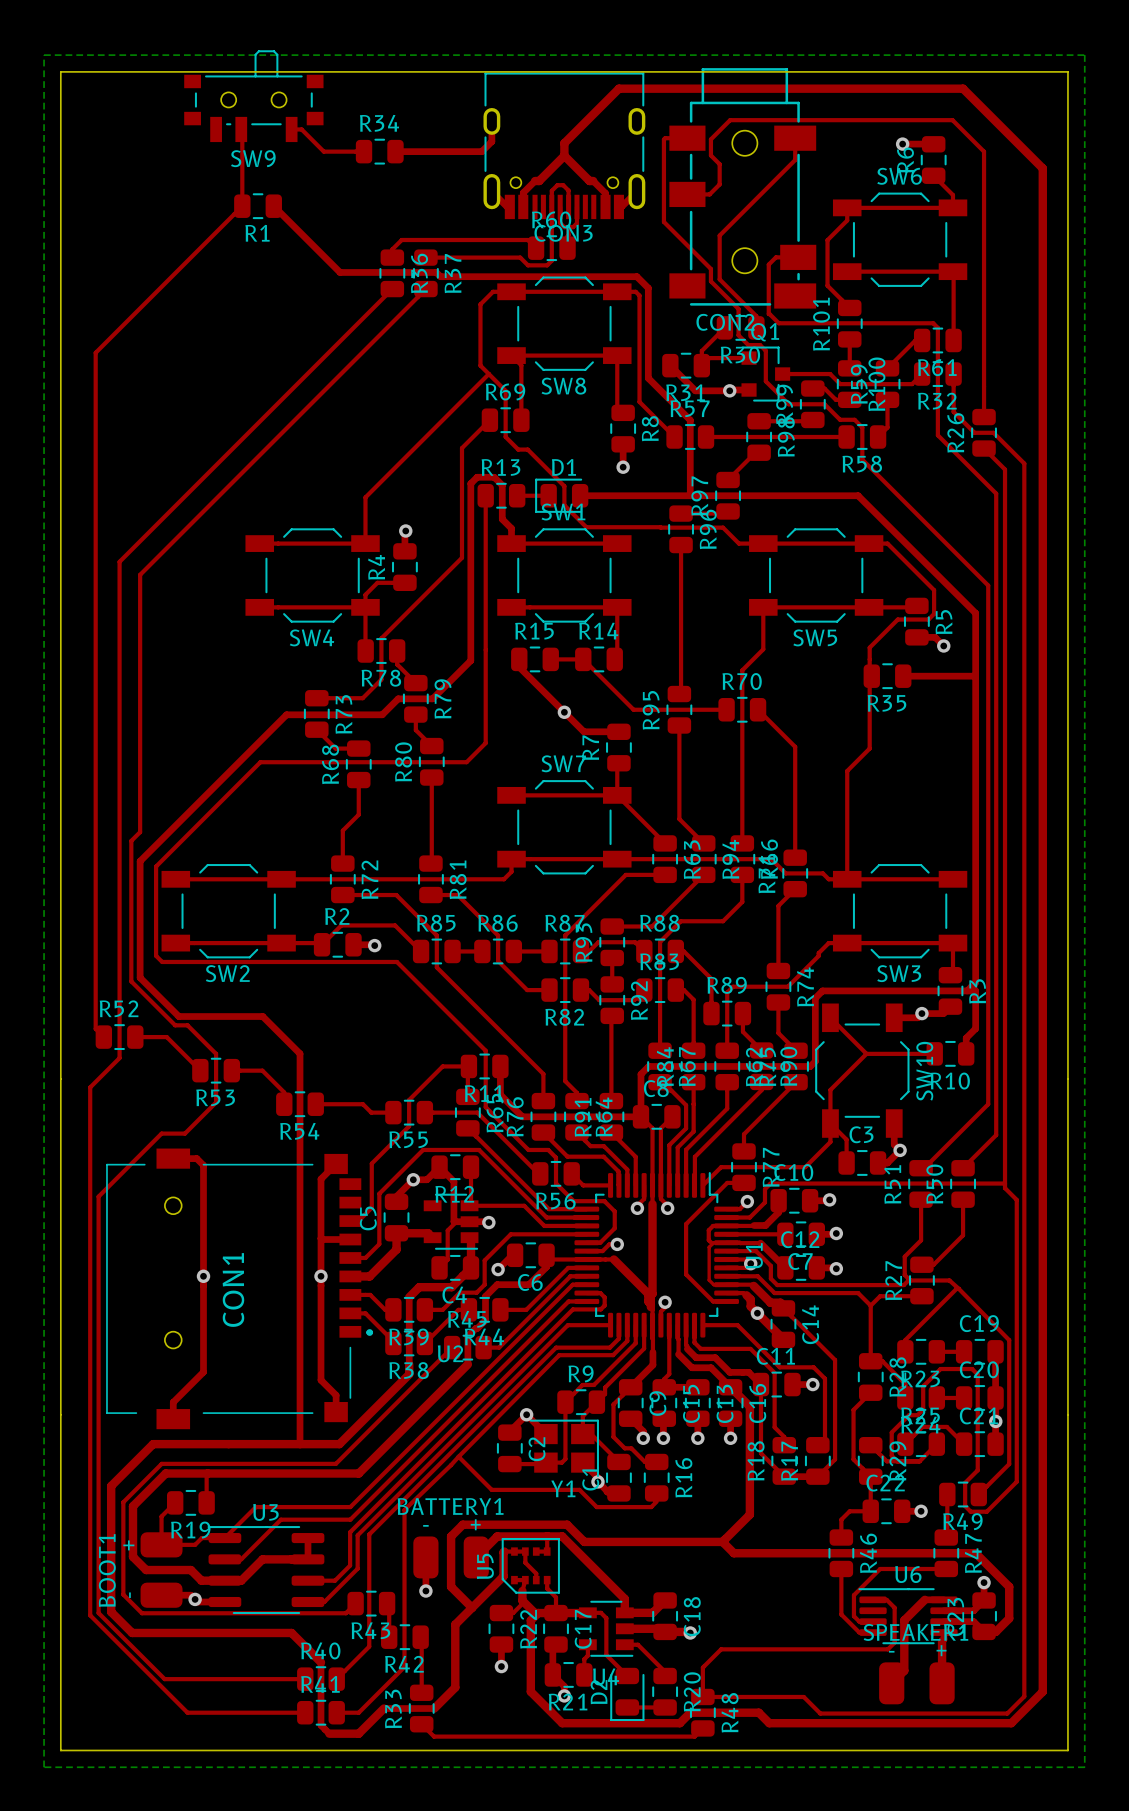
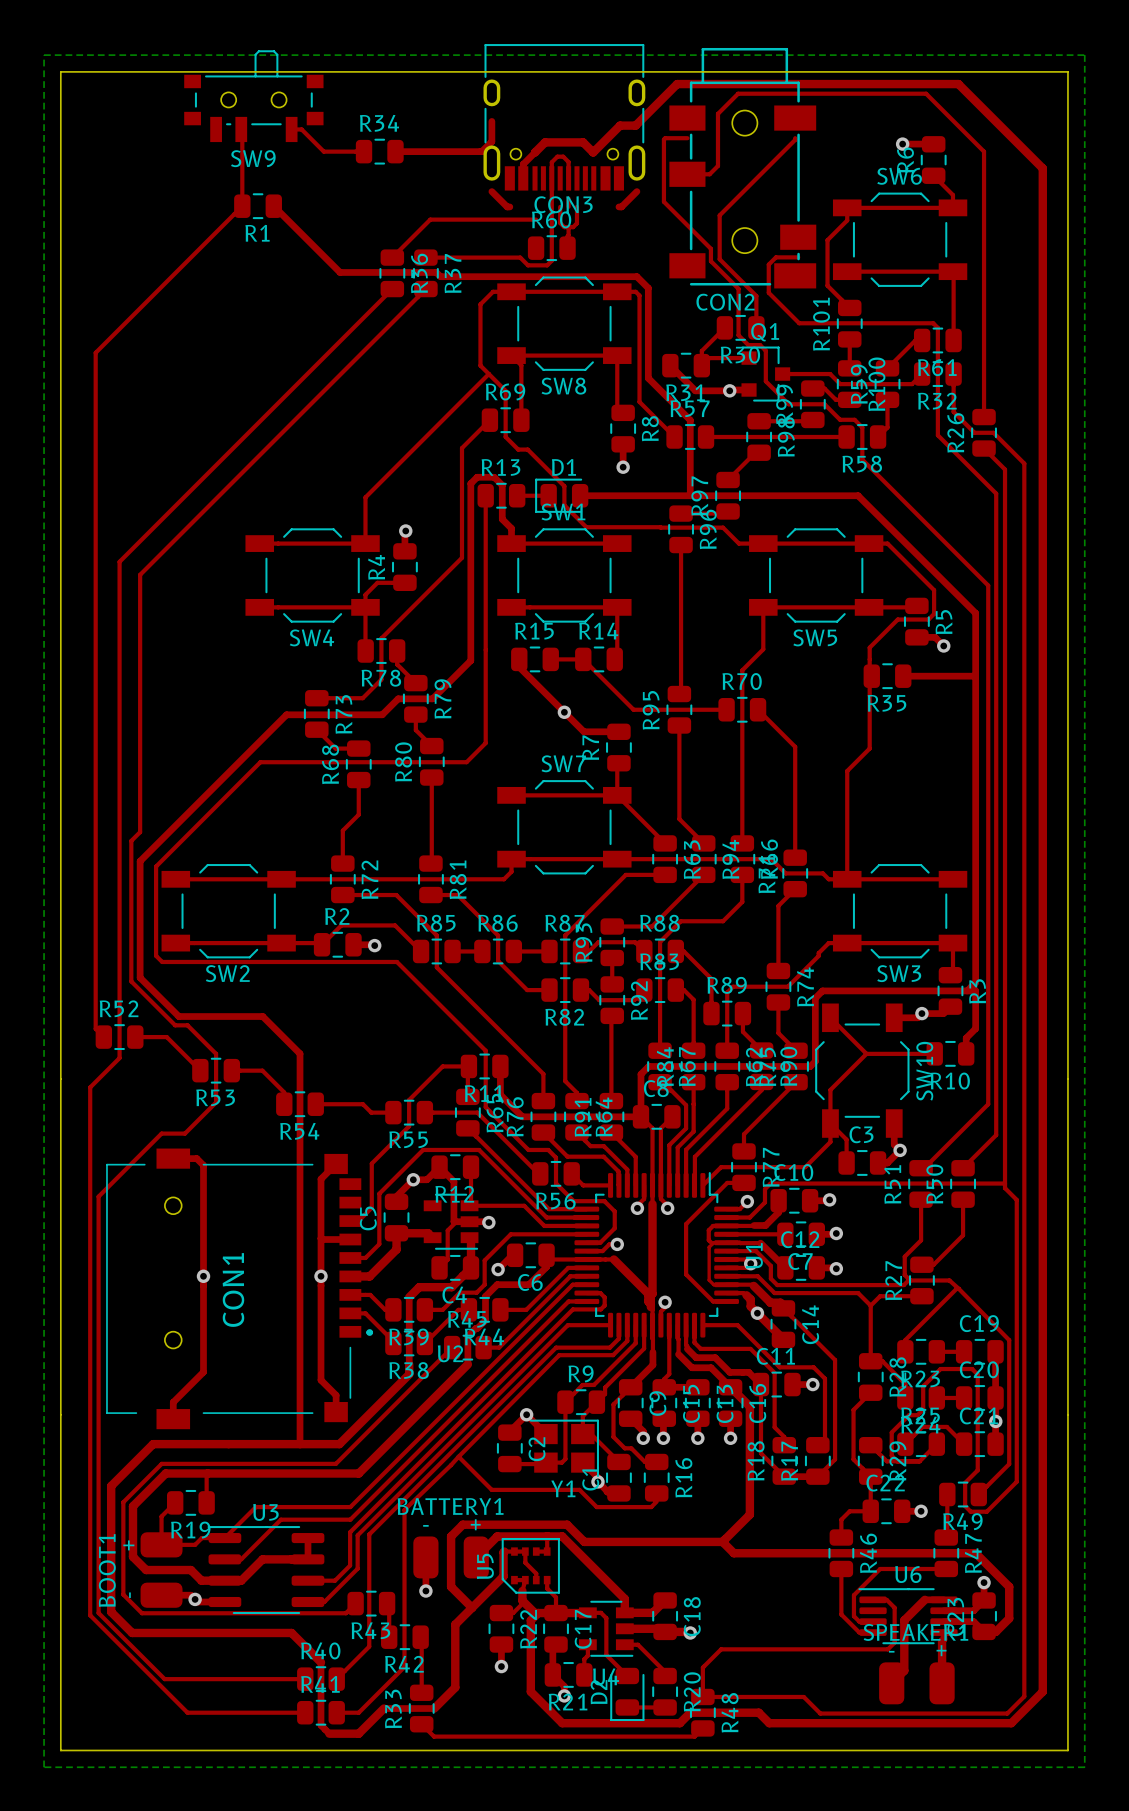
top track: (963, 88) (618, 88) (564, 143) (564, 155) -> (963, 88) (958, 84) (677, 84) (635, 125) (620, 125) (593, 152) (583, 142) (545, 142) (523, 164) (523, 178)
top track: (952, 120) (730, 120) (710, 139) (710, 155) (719, 164) (719, 184) (709, 194) (687, 194) -> (952, 120) (926, 93) (738, 93) (717, 113) (717, 165) (709, 174) (687, 174)
top track: (795, 139) (795, 160) (719, 235) -> (795, 139) (719, 215) (719, 235)
CON3 position: (564, 145) -> (564, 117)
top track: (564, 155) (589, 181) (593, 181) (605, 193) (605, 206) -> none
top track: (564, 155) (539, 181) (535, 181) (523, 192) (523, 206) -> none
CON2 position: (742, 188) -> (742, 168)
top track: (551, 190) (557, 185) (563, 185) (568, 190) (568, 198) -> (551, 190) (551, 162) (557, 156) (563, 156) (568, 162) (568, 178)
top track: (663, 201) (663, 221) (710, 268) (710, 281) (738, 308) -> (663, 201) (710, 248) (710, 261) (738, 288) (738, 308)
top track: (536, 248) (527, 240) (401, 240) (392, 249) (392, 257) -> (536, 219) (430, 219) (392, 257)
top track: (719, 259) (719, 279) (756, 316) -> (719, 259) (756, 295) (756, 316)
top track: (768, 292) (768, 314) (778, 323) (799, 323) -> (768, 292) (799, 323)

